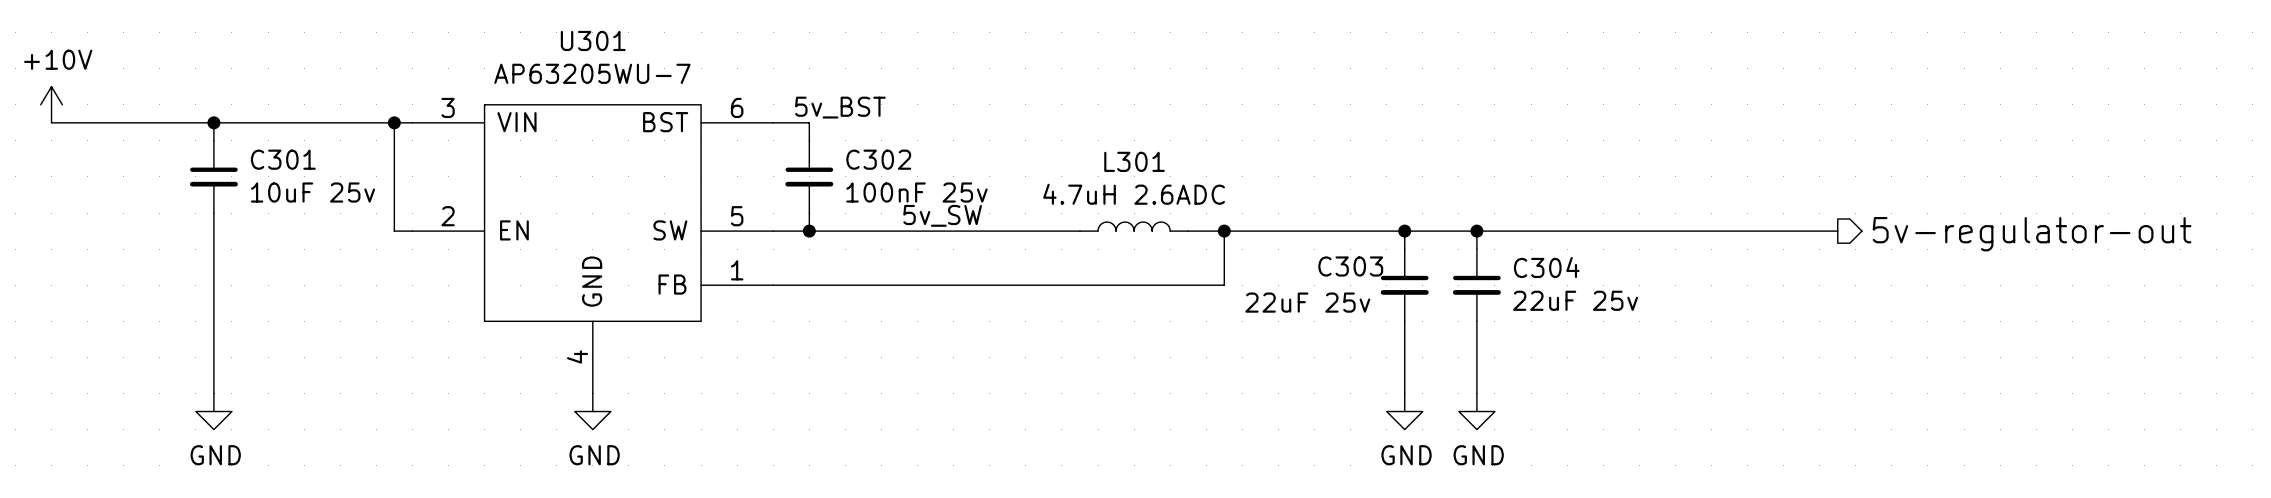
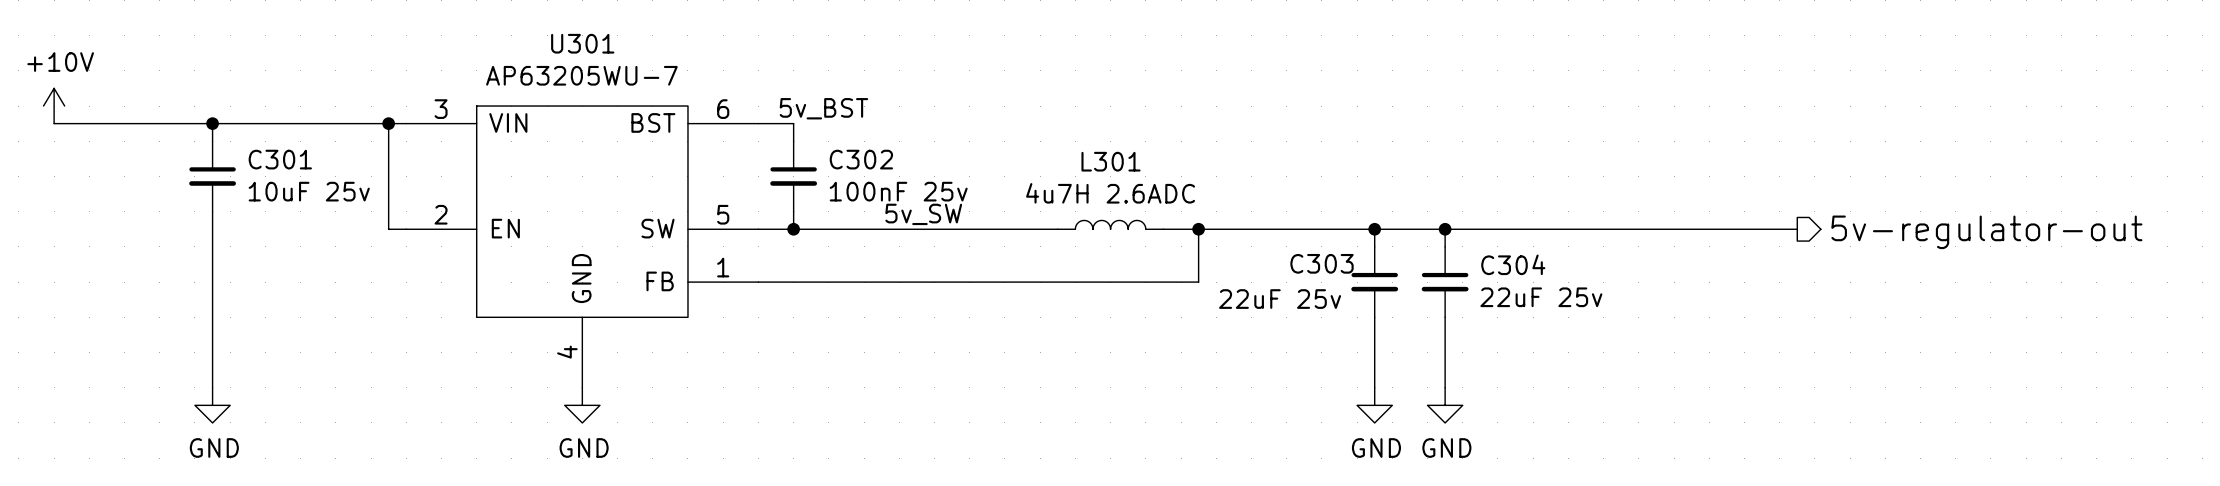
L301 value: 4.7uH 2.6ADC (1134, 194) -> 4u7H 2.6ADC (1110, 193)

